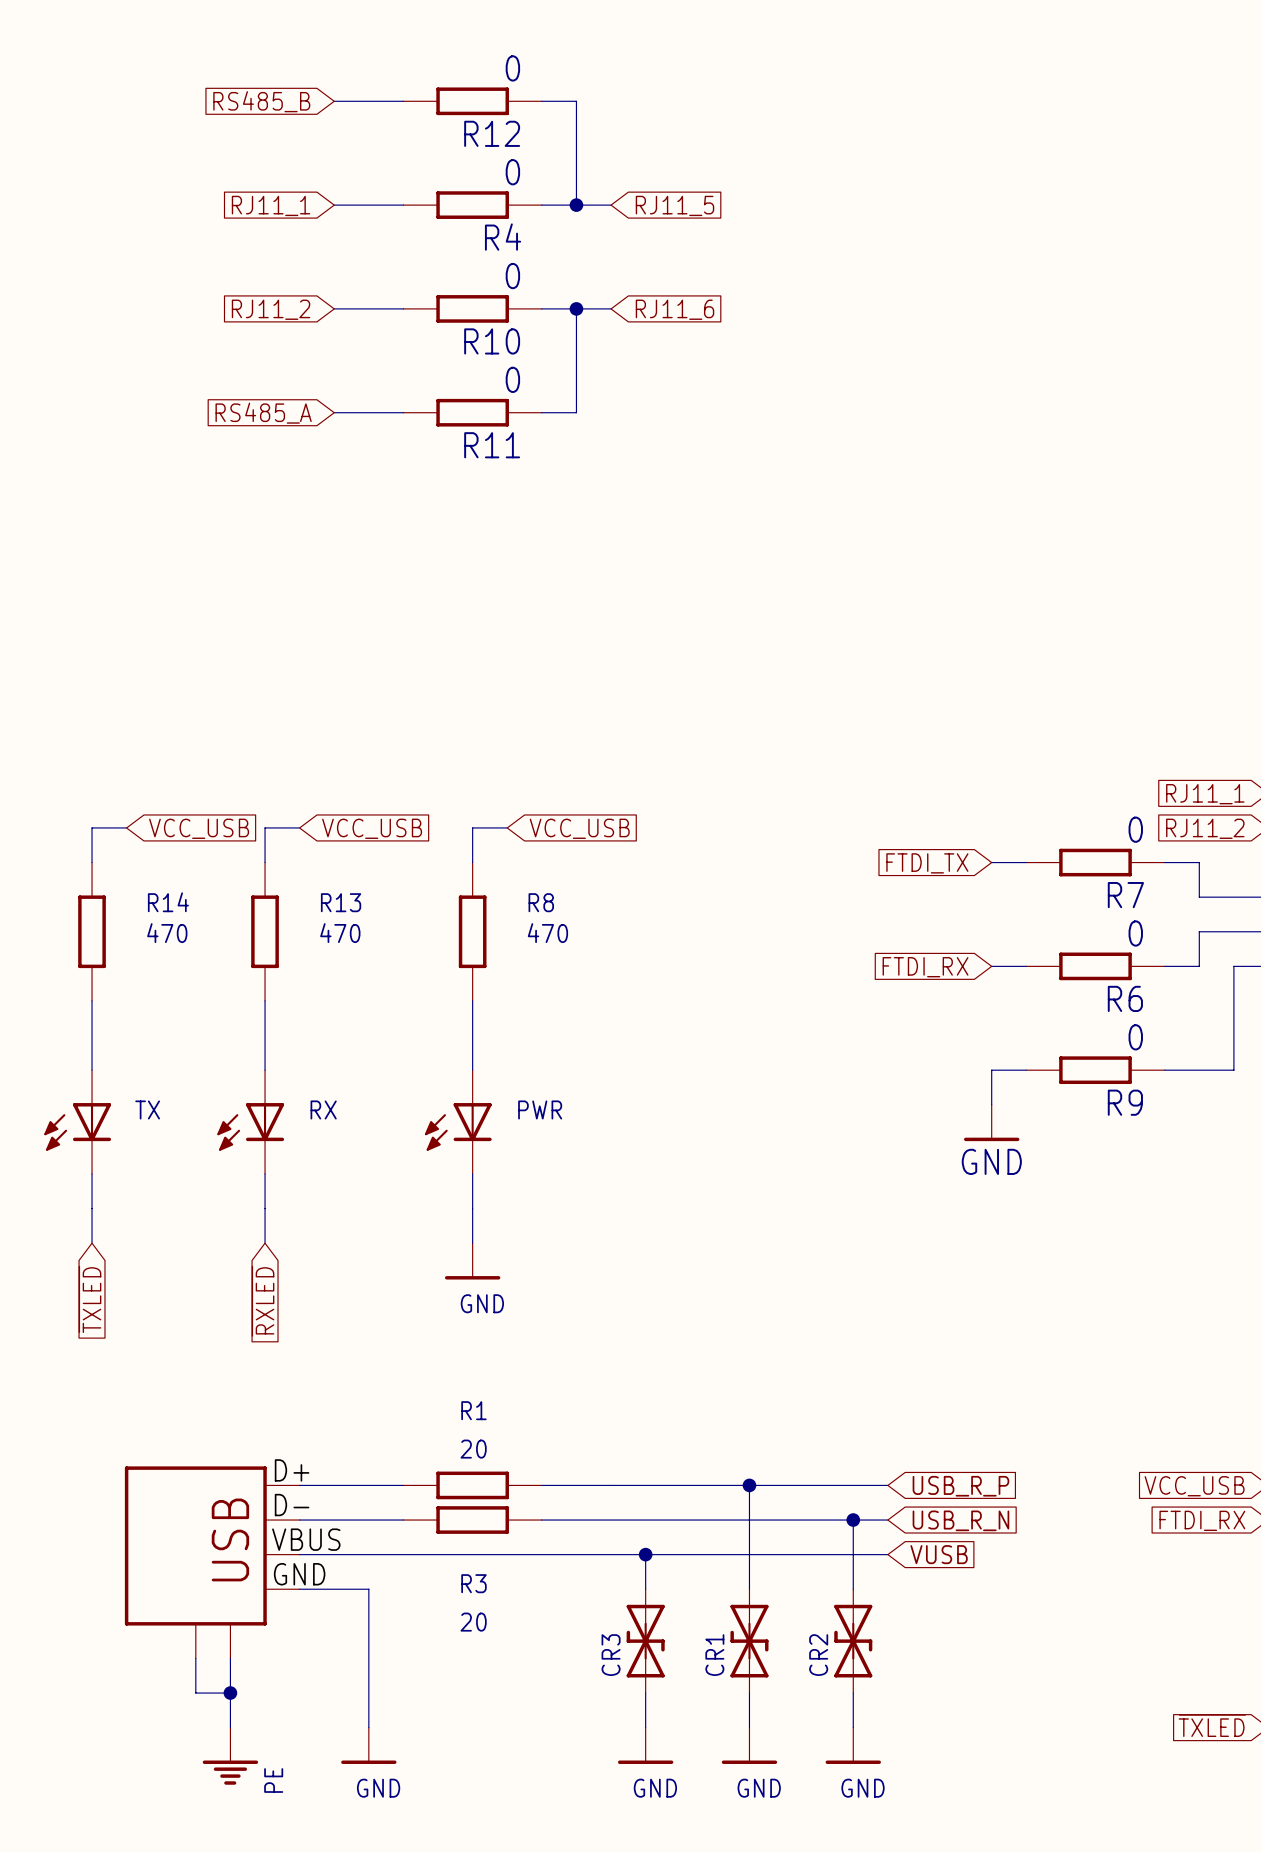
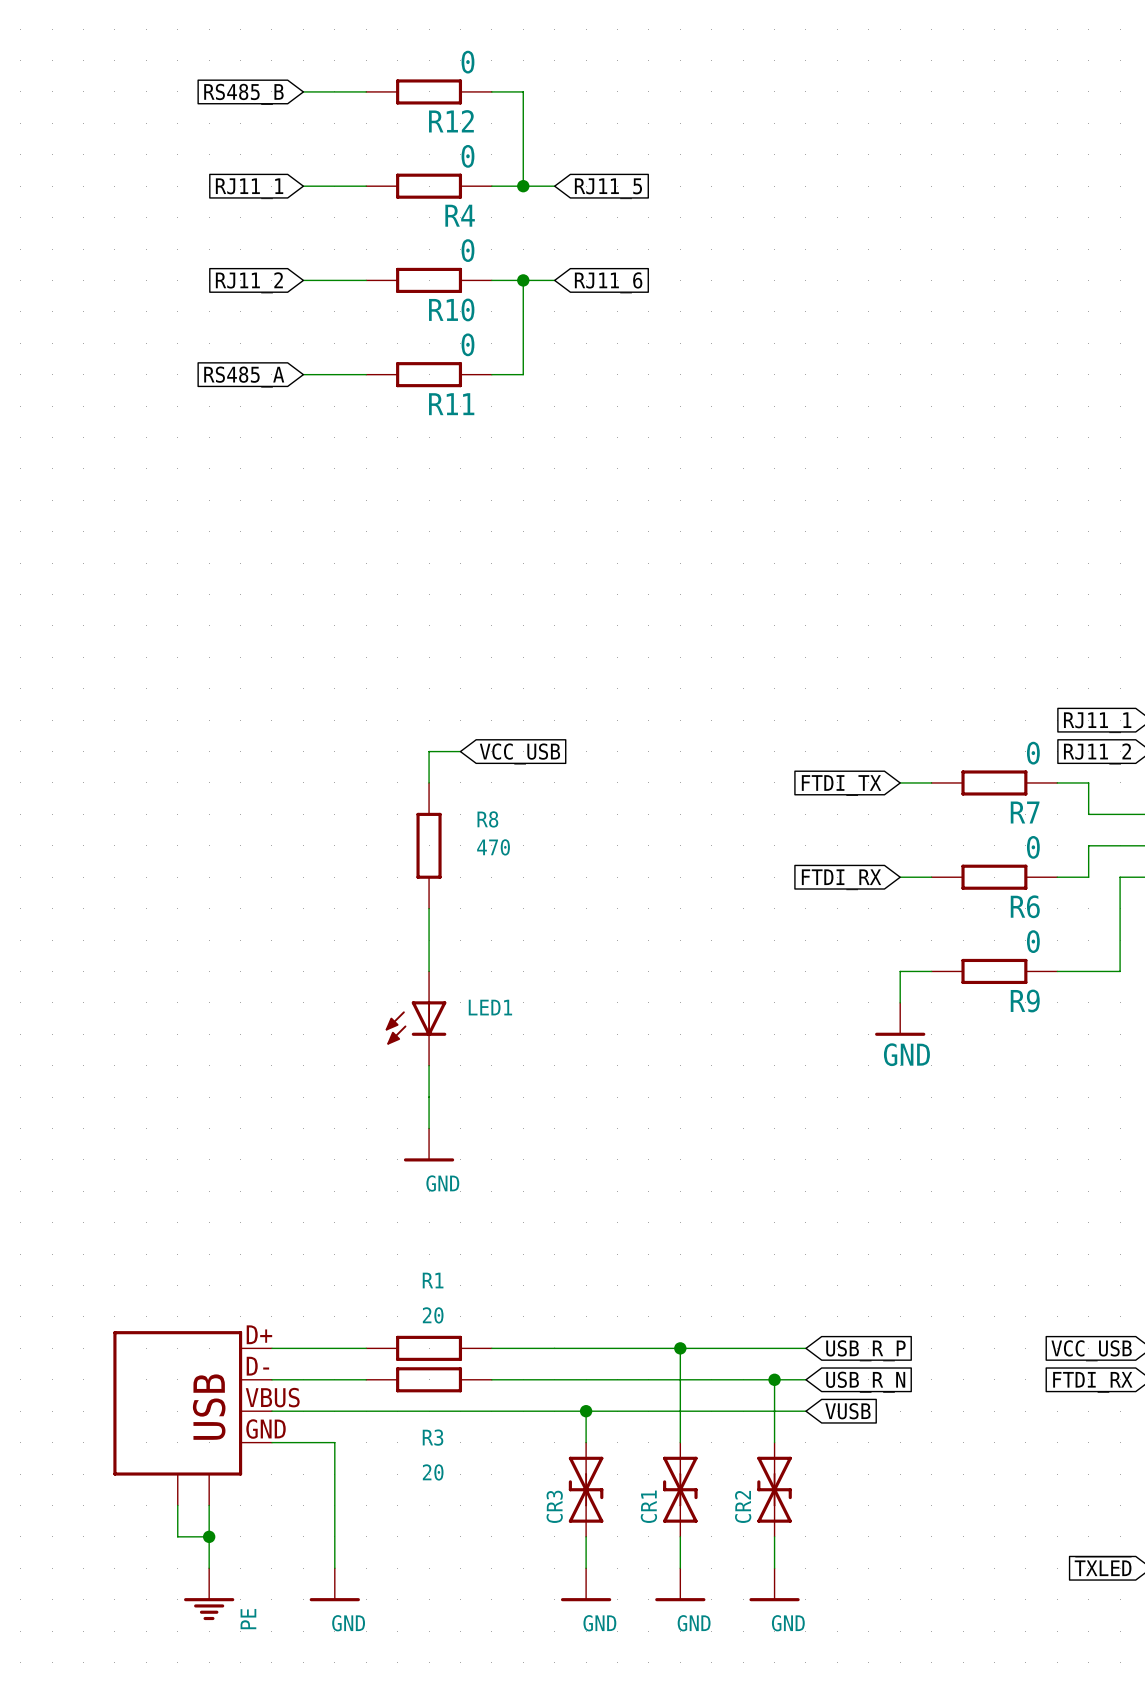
wire: (126, 827) (92, 827) (92, 862) -> none
wire: (299, 827) (265, 827) (265, 862) -> none
global label: VCC_USB (199, 828) -> none
global label: VCC_USB (372, 828) -> none
R14: 470 (92, 931) -> none
R13: 470 (265, 931) -> none
wire: (92, 1000) (92, 1070) -> none
wire: (265, 1000) (265, 1070) -> none
PWR name: PWR (540, 1109) -> LED1 (490, 1007)
TX: (77, 1122) -> none
RX: (250, 1122) -> none
wire: (92, 1173) (92, 1243) -> none
wire: (265, 1173) (265, 1243) -> none
global label: ~{TXLED} (90, 1299) -> none
global label: ~{RXLED} (263, 1301) -> none

